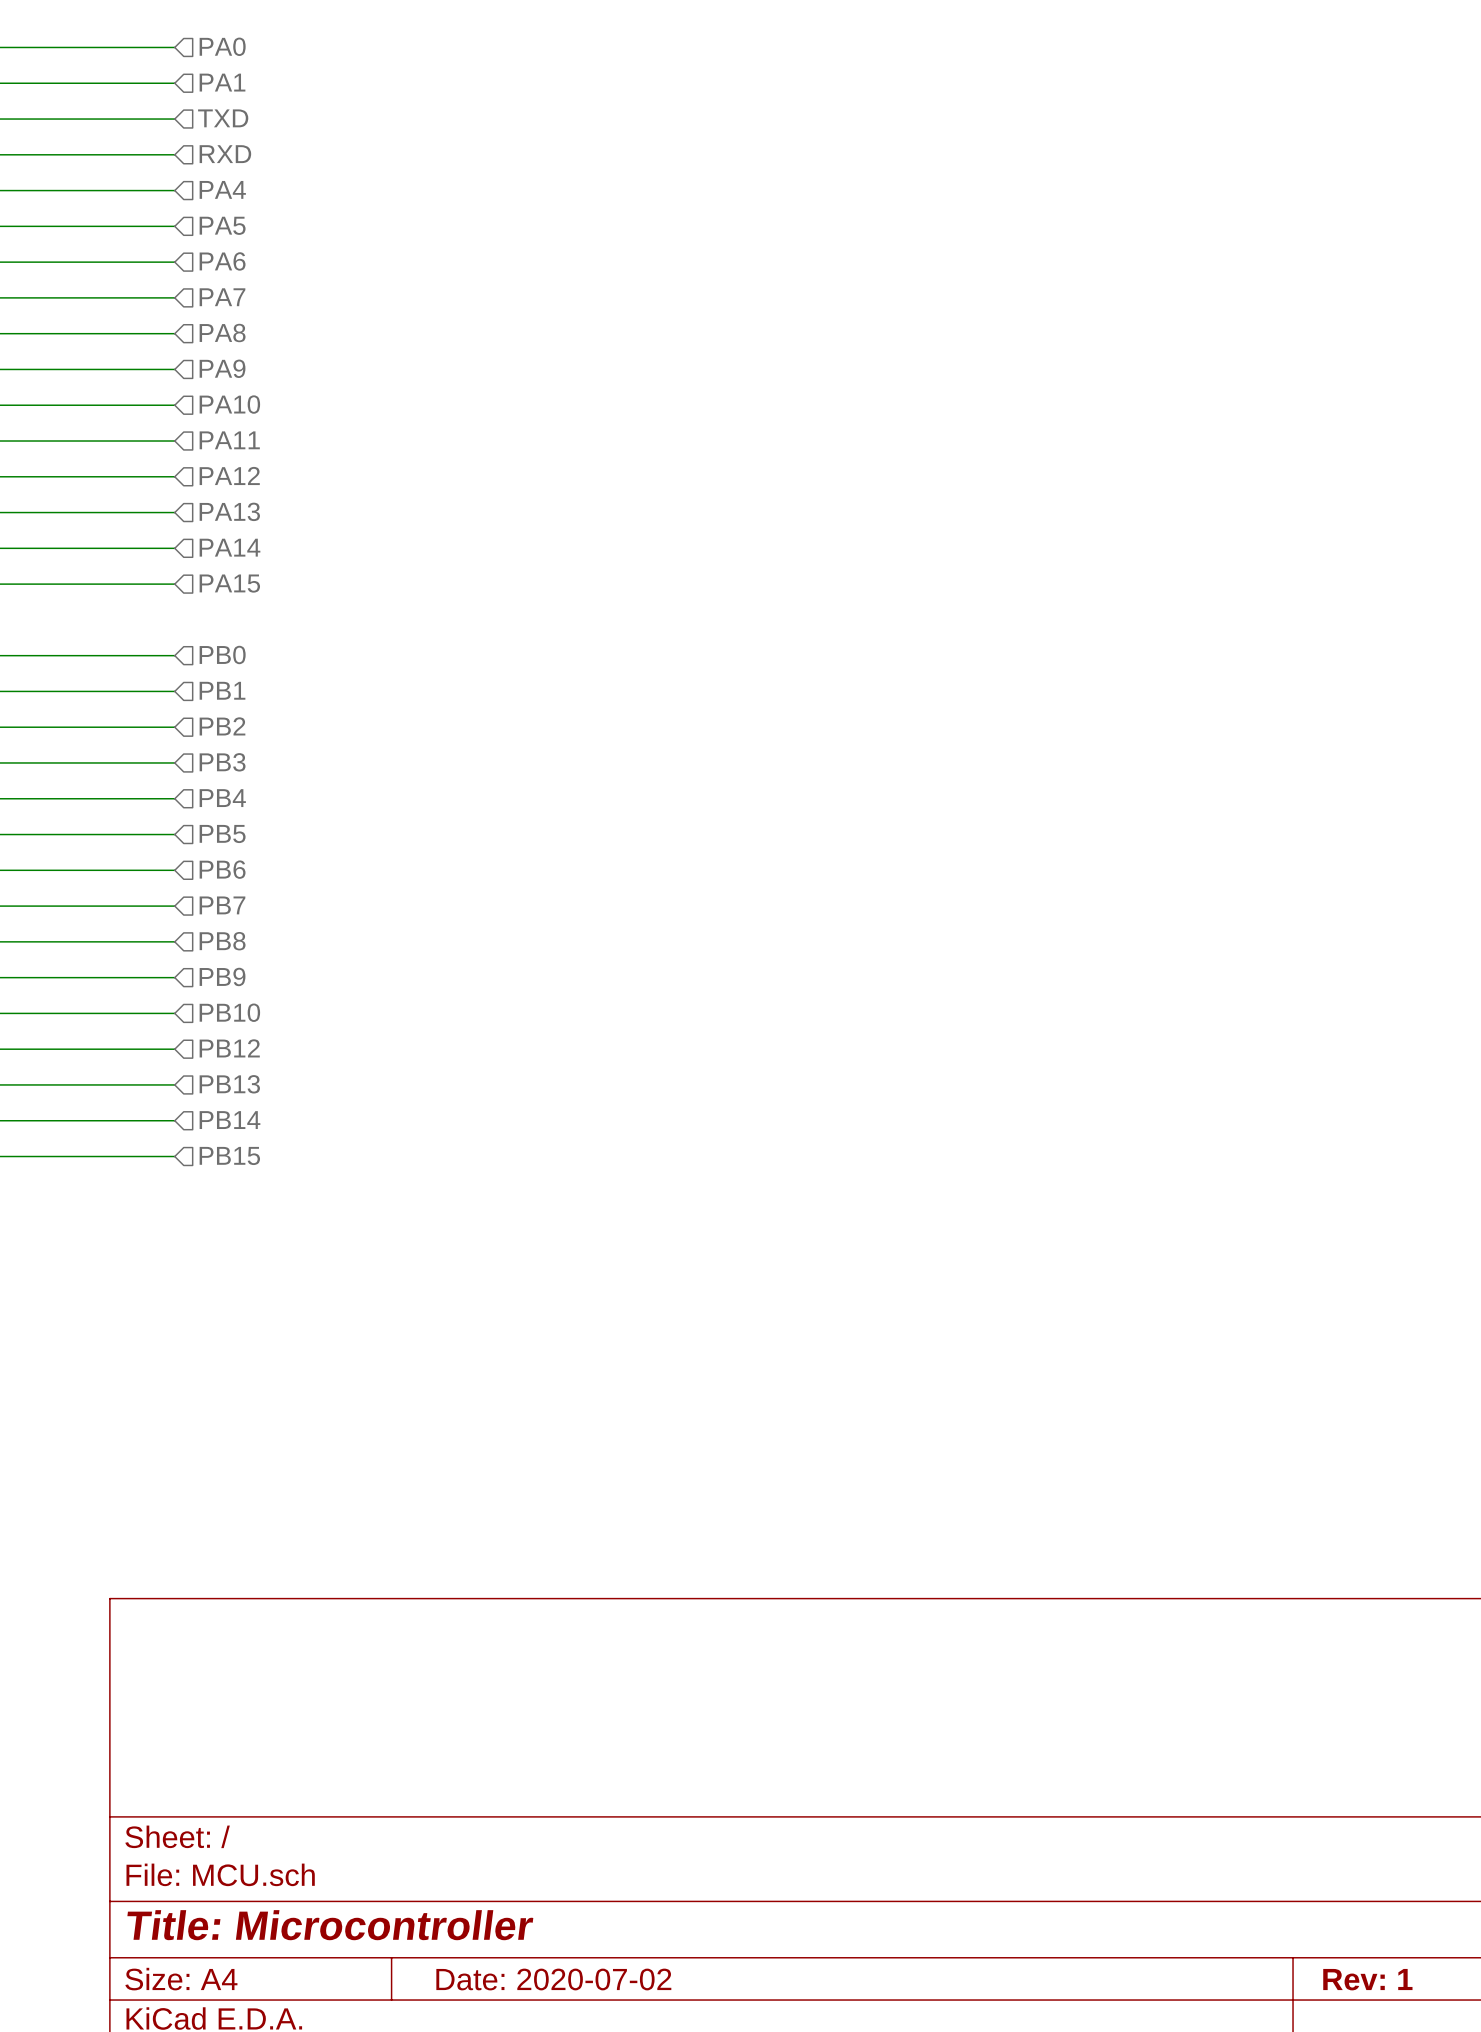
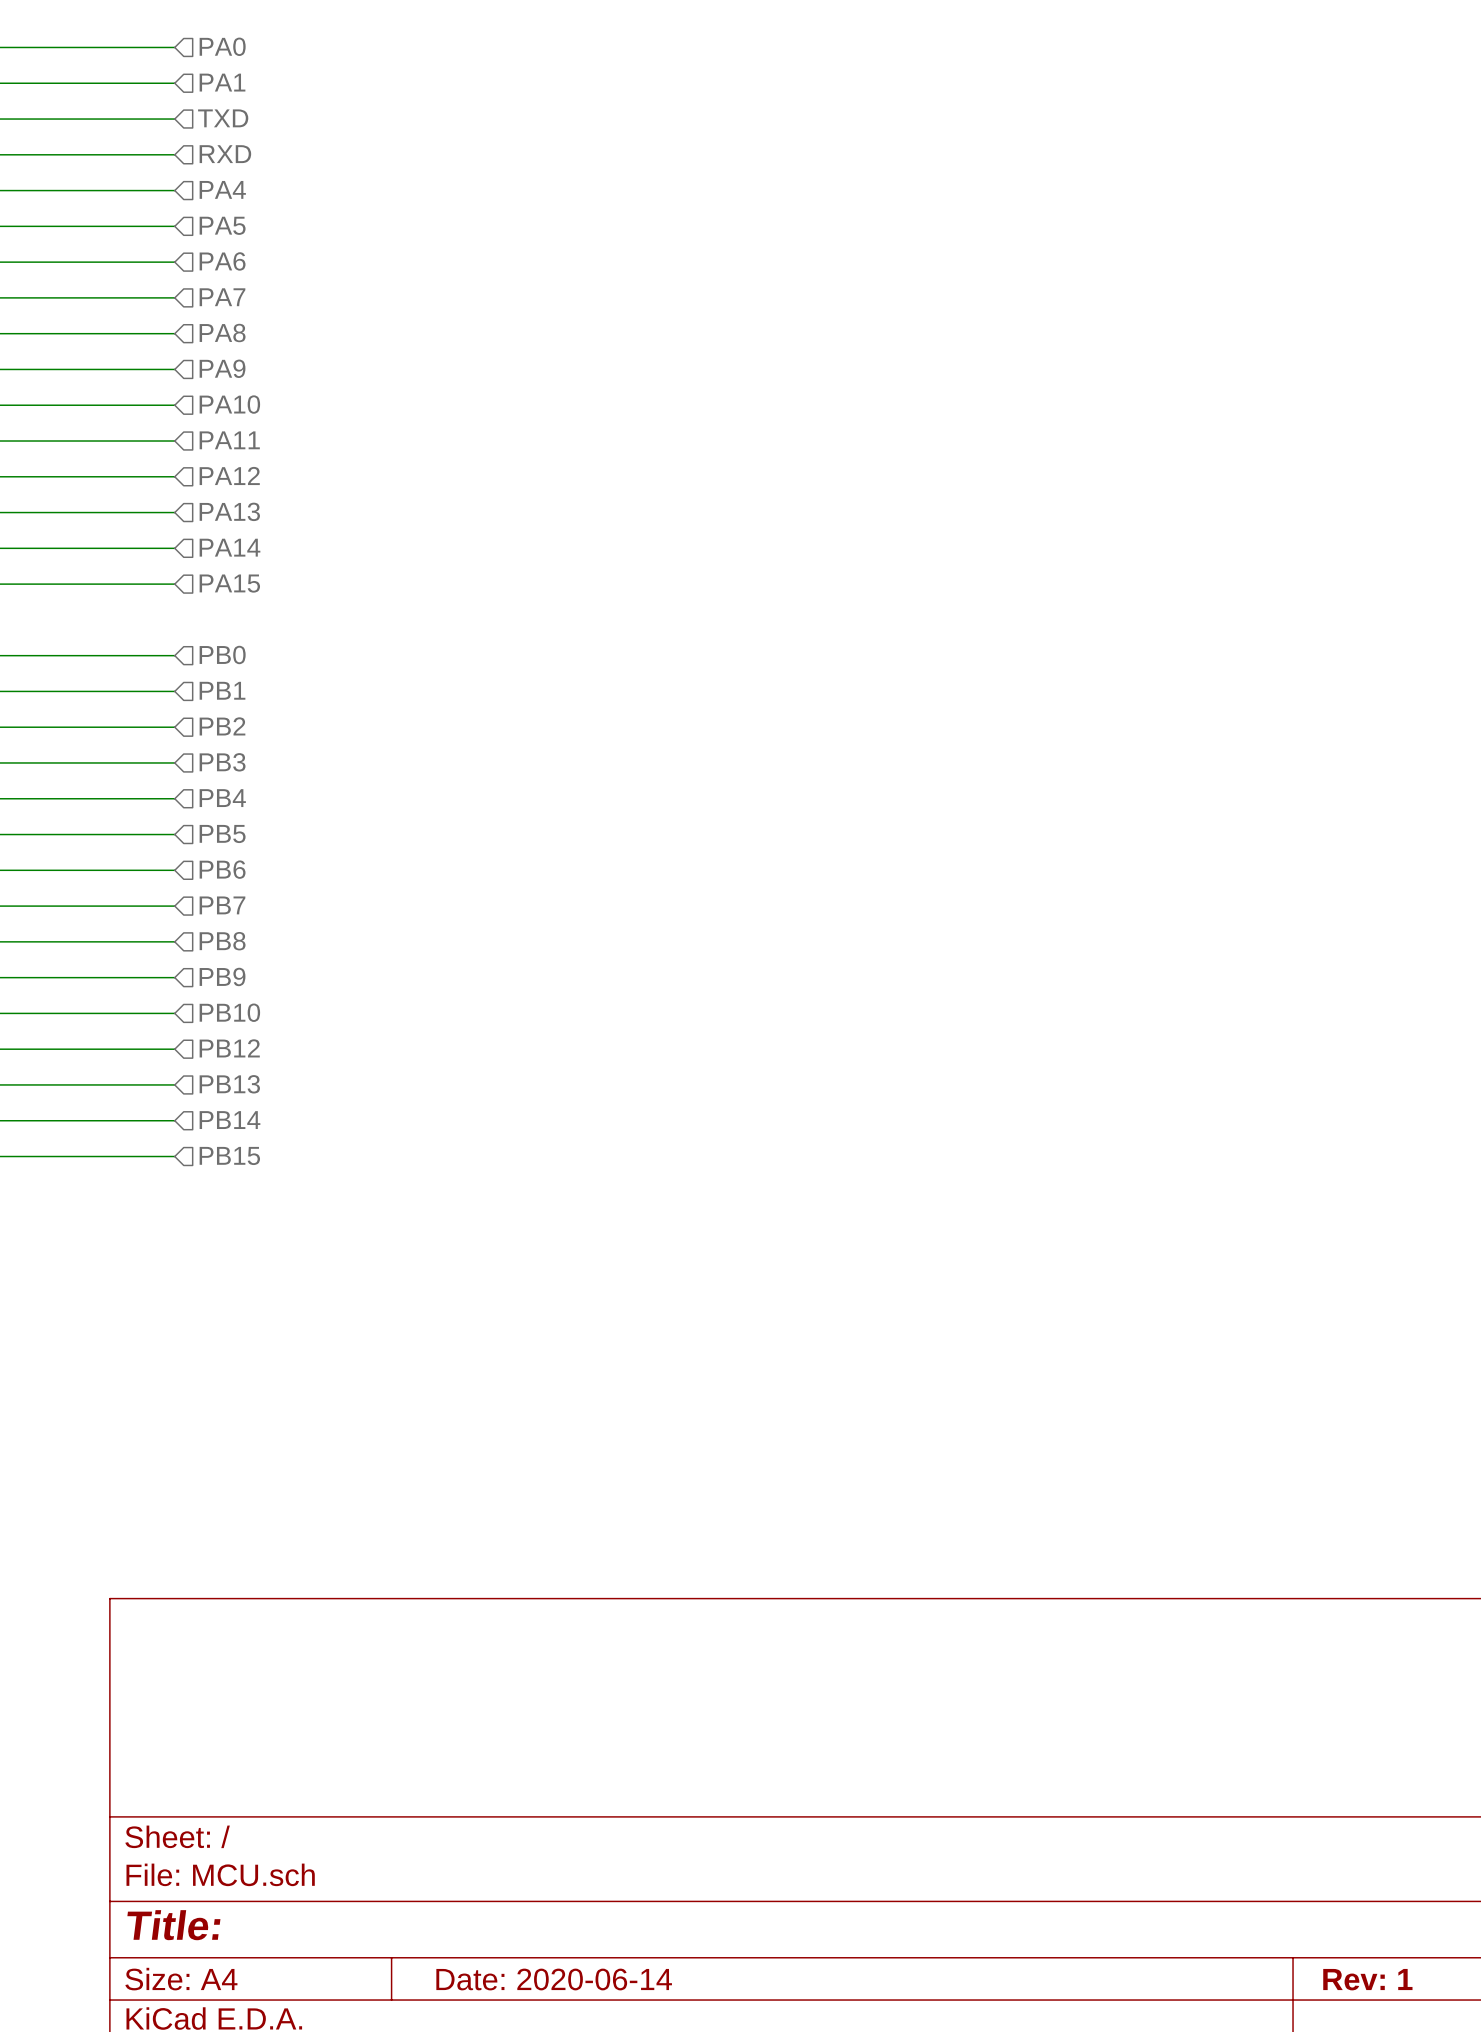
title block: Title: Microcontroller (330, 1925) -> Title: (173, 1925)
title block: Date: 2020-07-02 (553, 1979) -> Date: 2020-06-14 (554, 1979)

